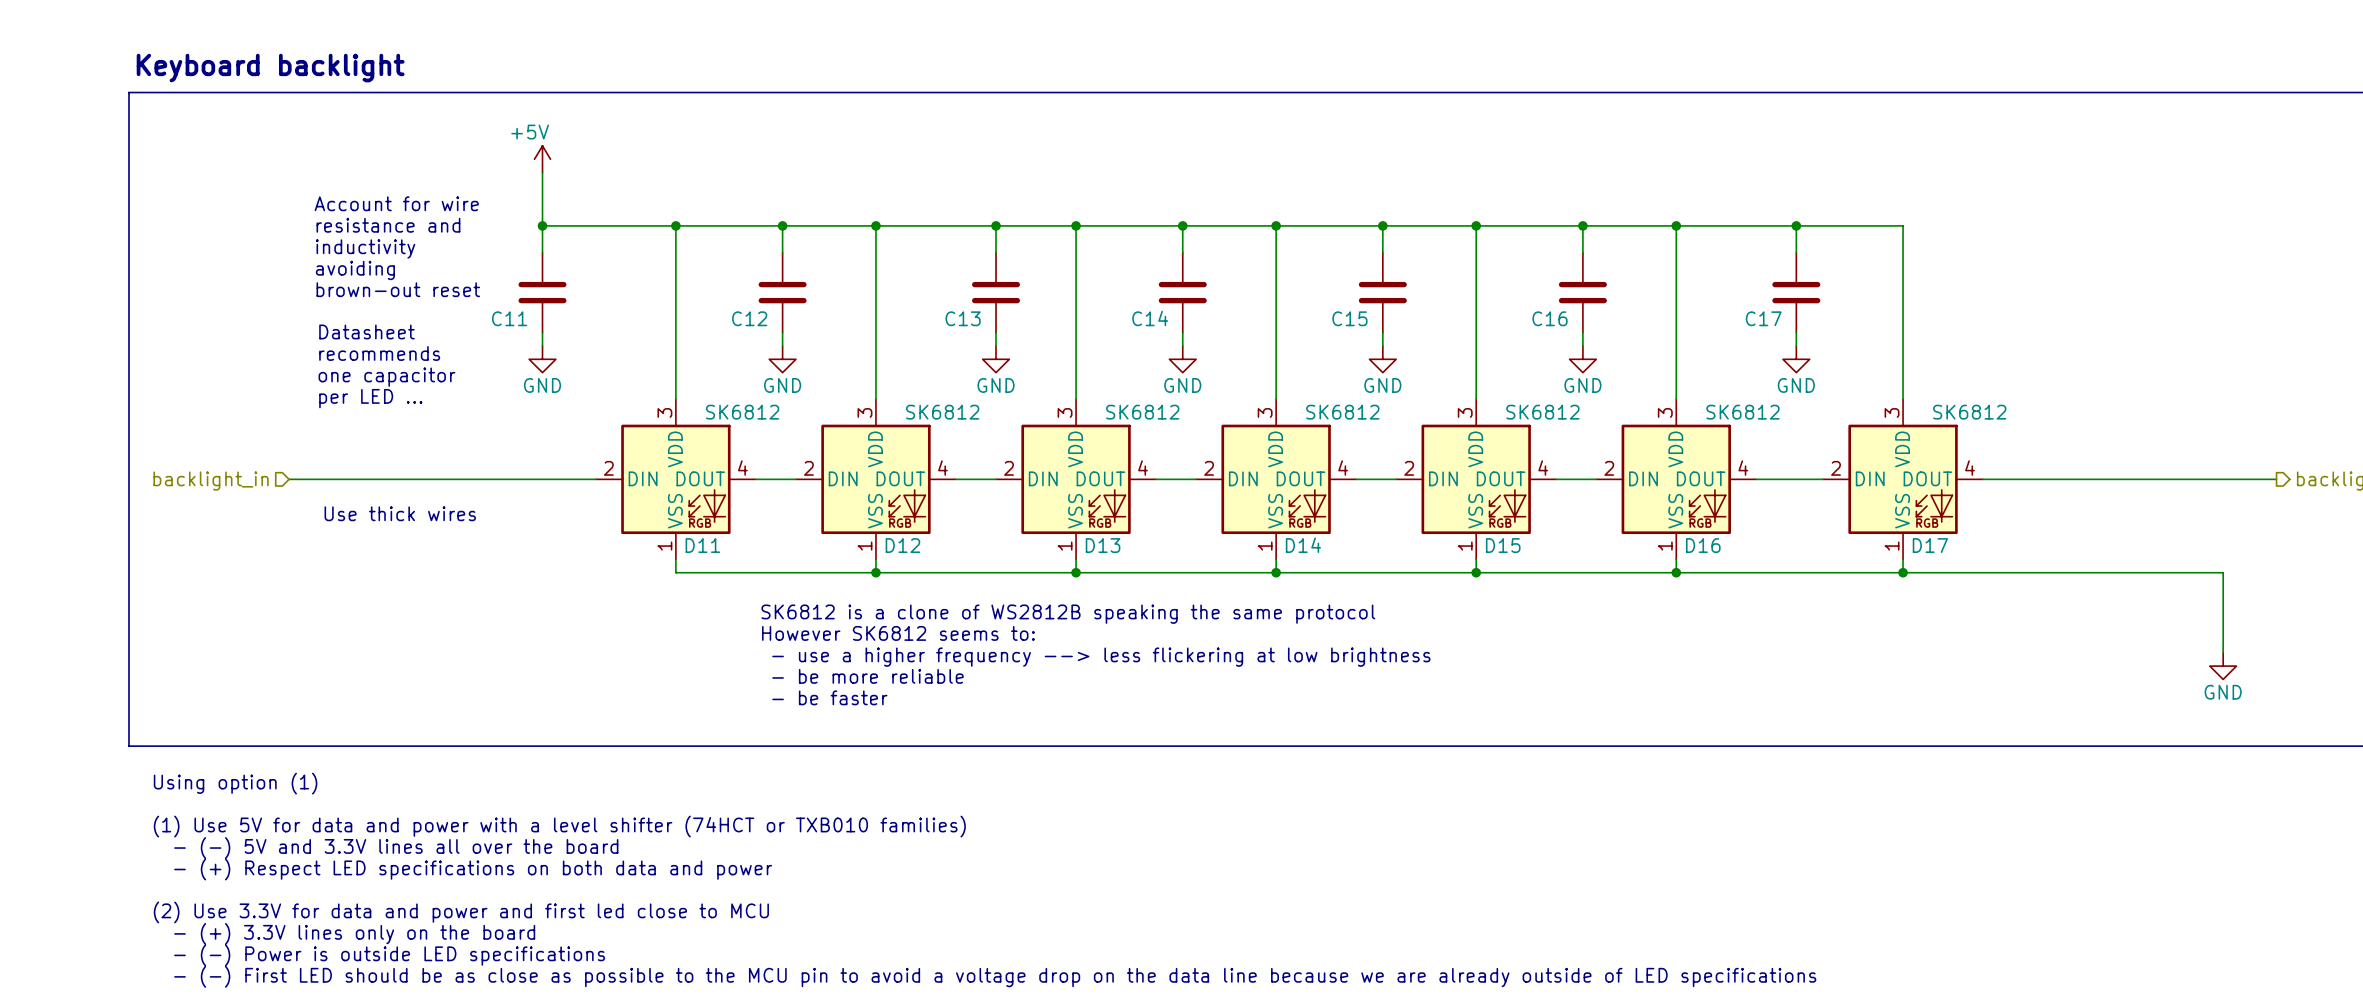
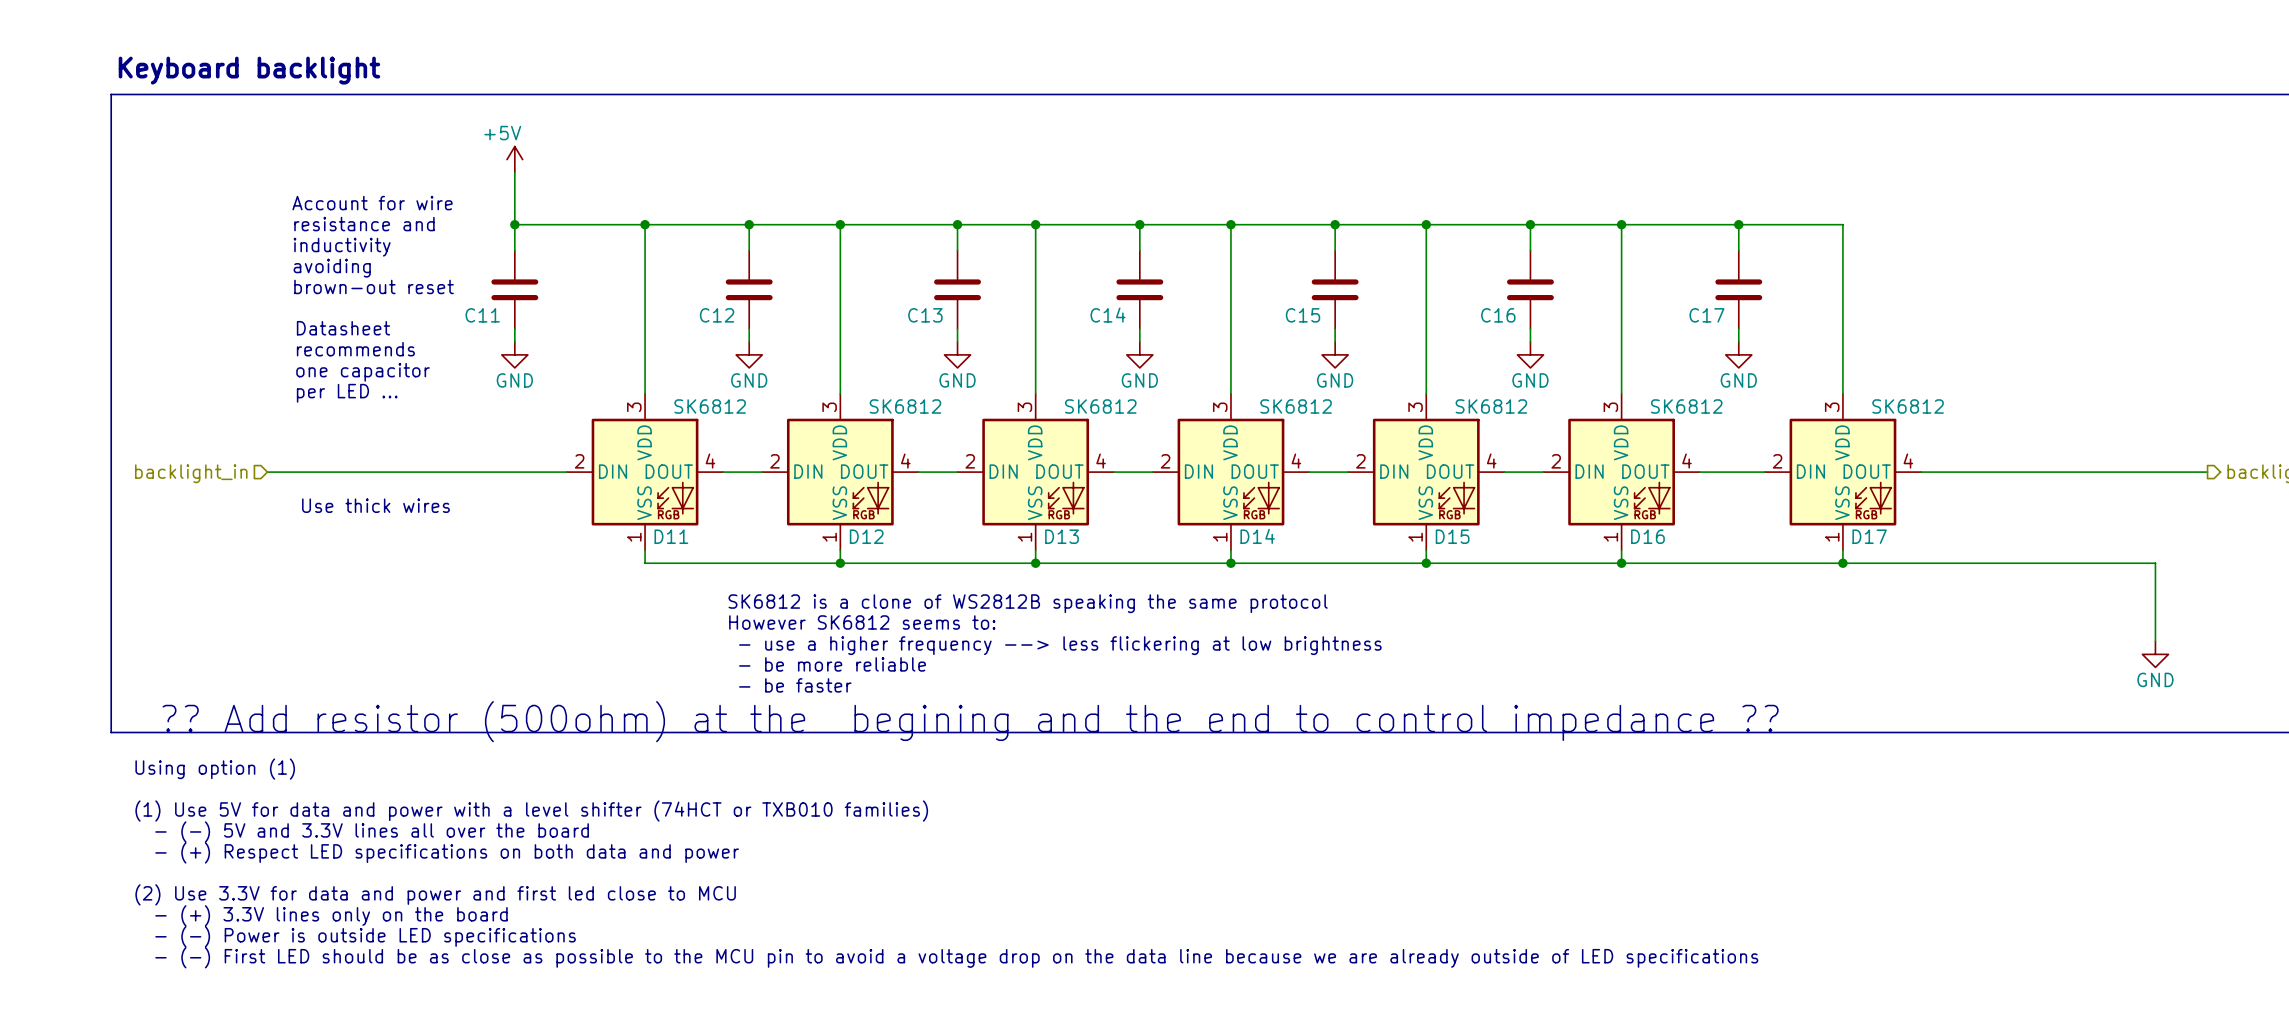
text: none -> ?? Add resistor (500ohm) at the begining and the end to control impedance ?? (970, 721)

